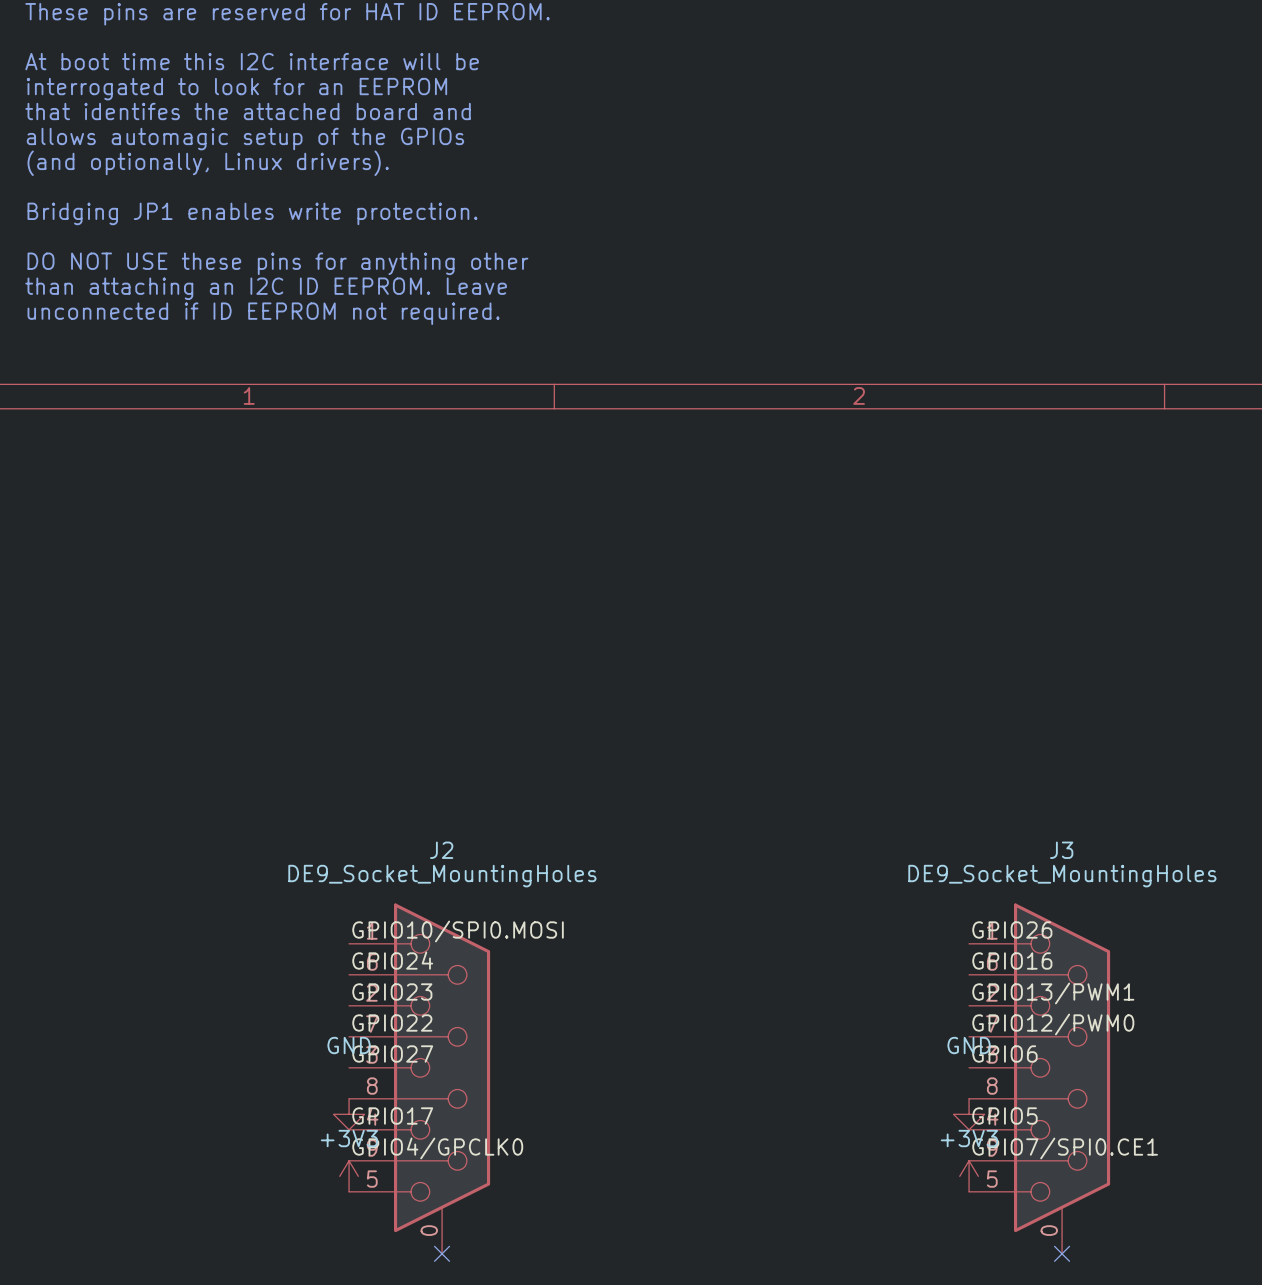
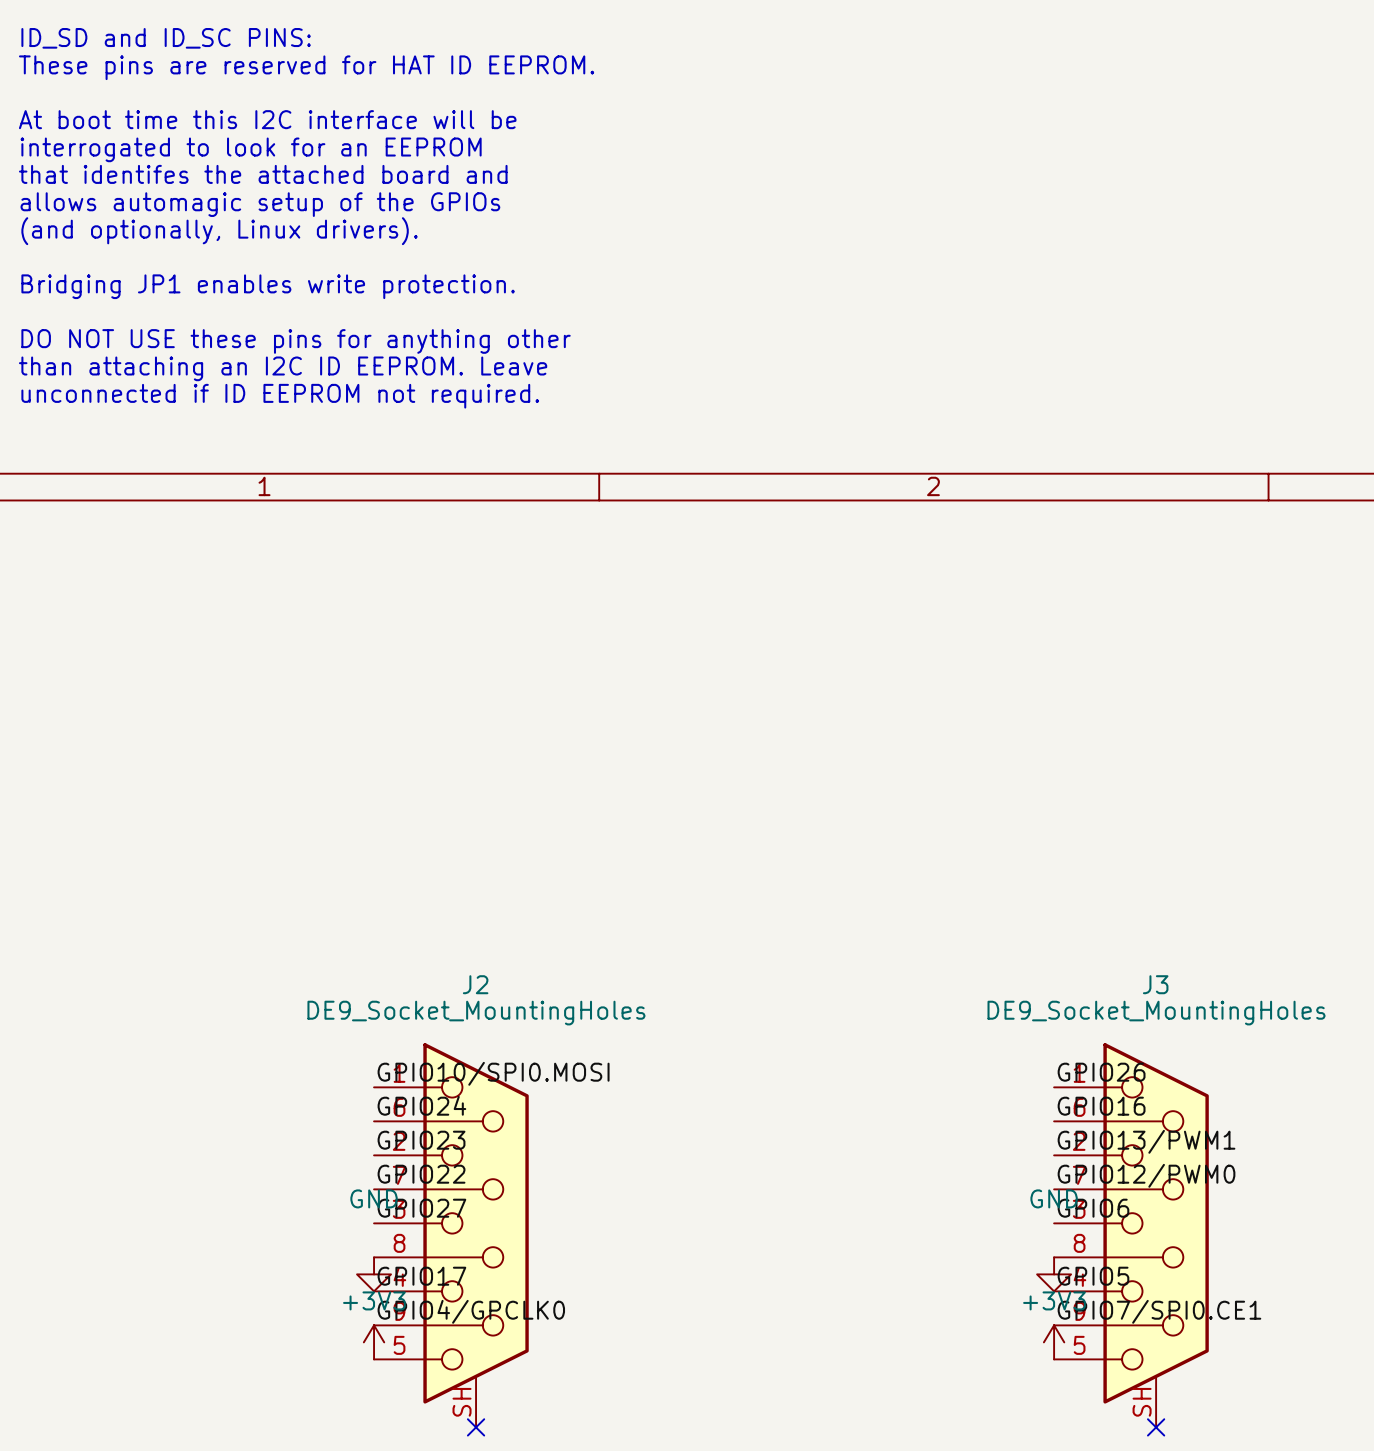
J2 pin number: 0 (429, 1230) -> SH (462, 1402)
J3 pin number: 0 (1049, 1230) -> SH (1142, 1402)

